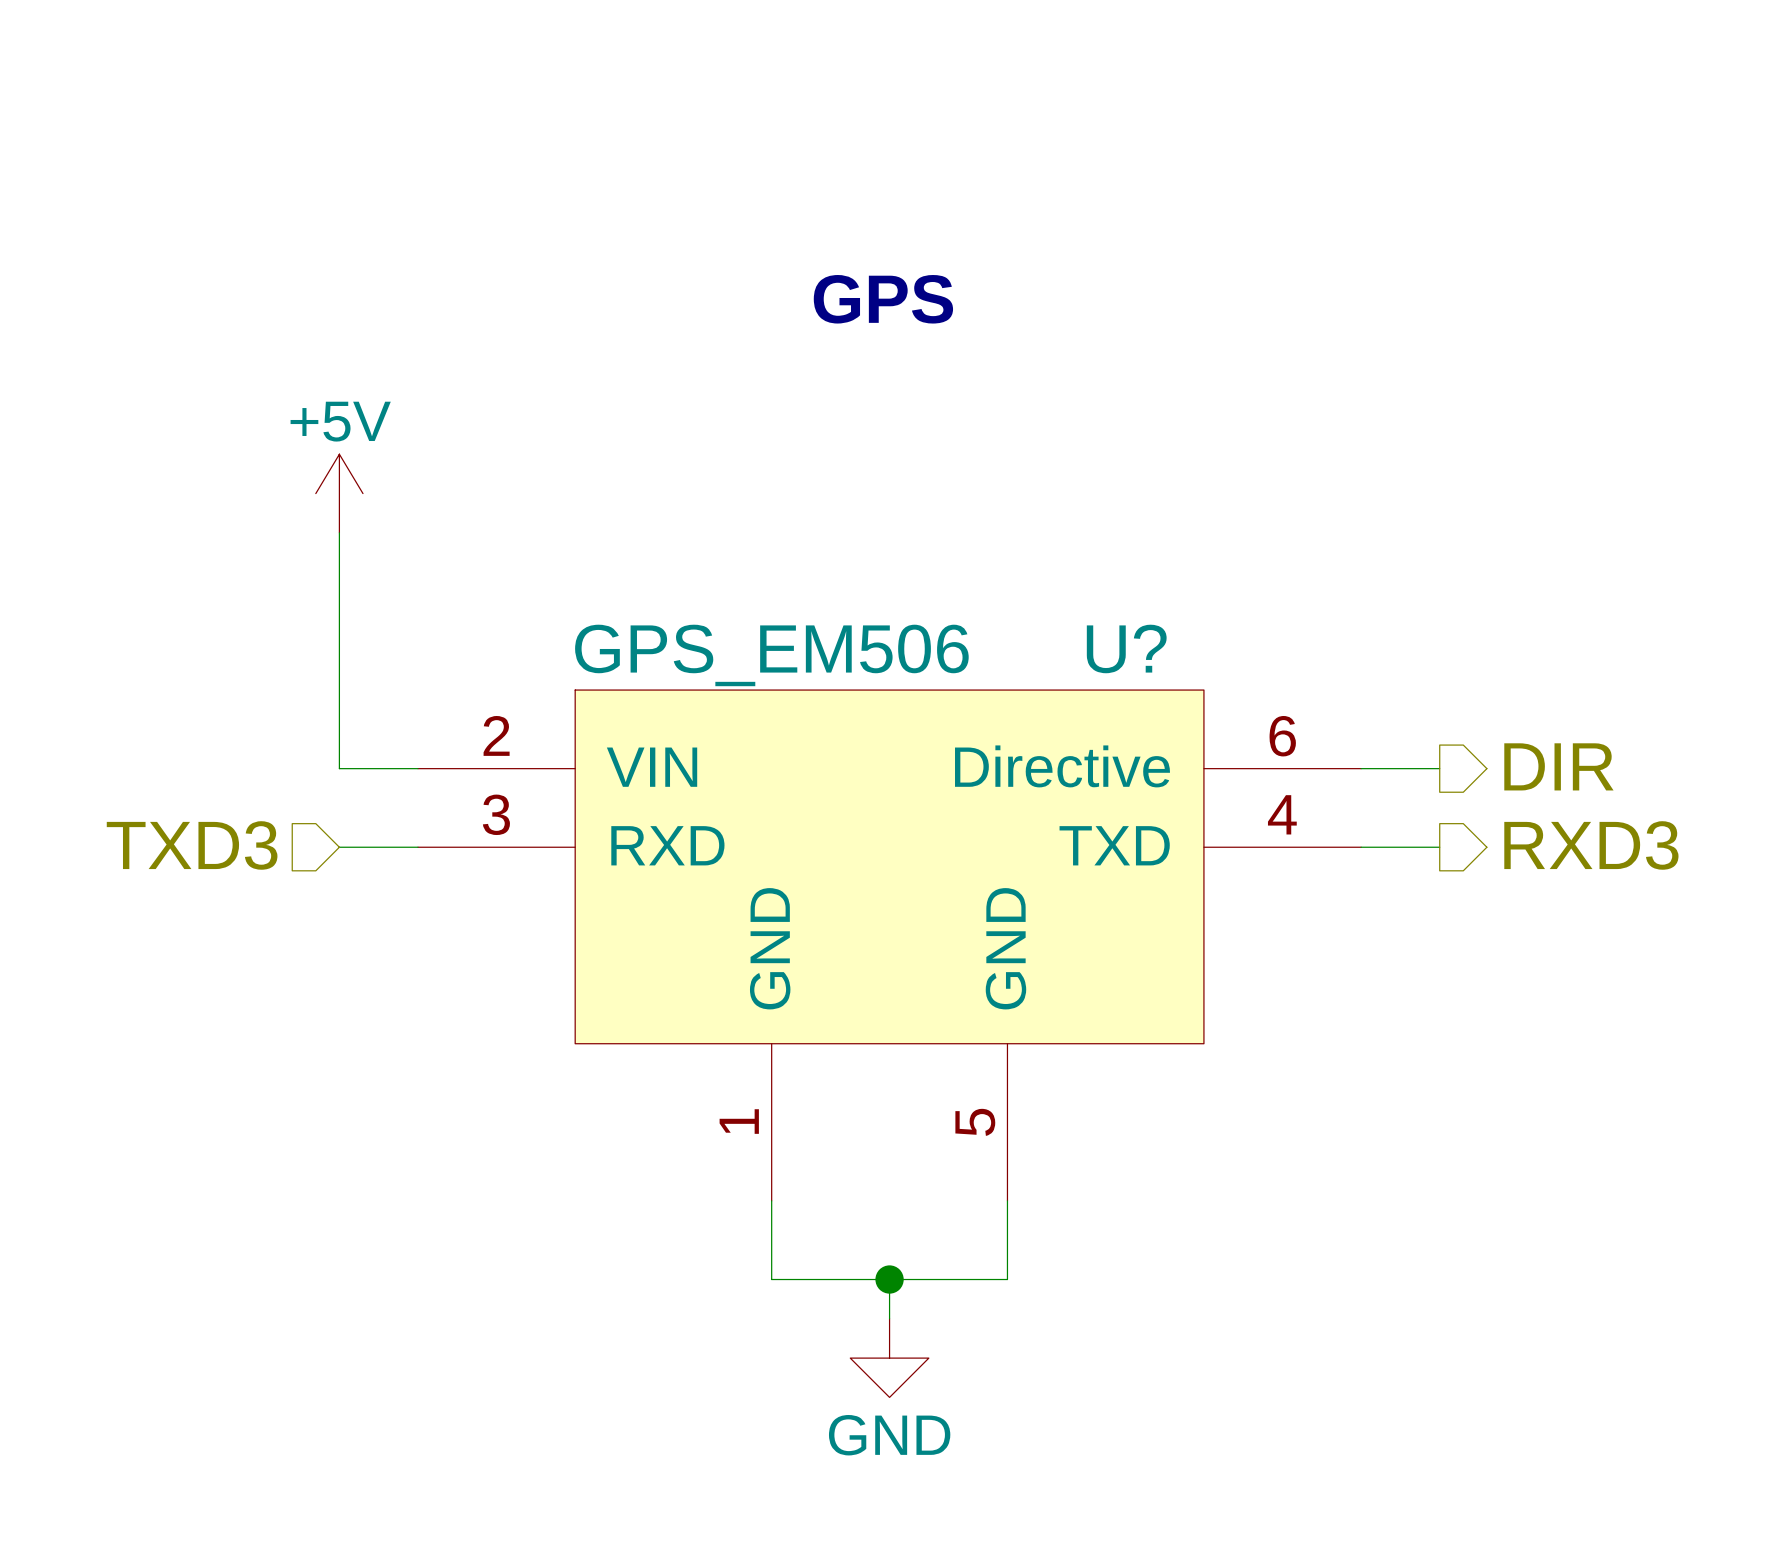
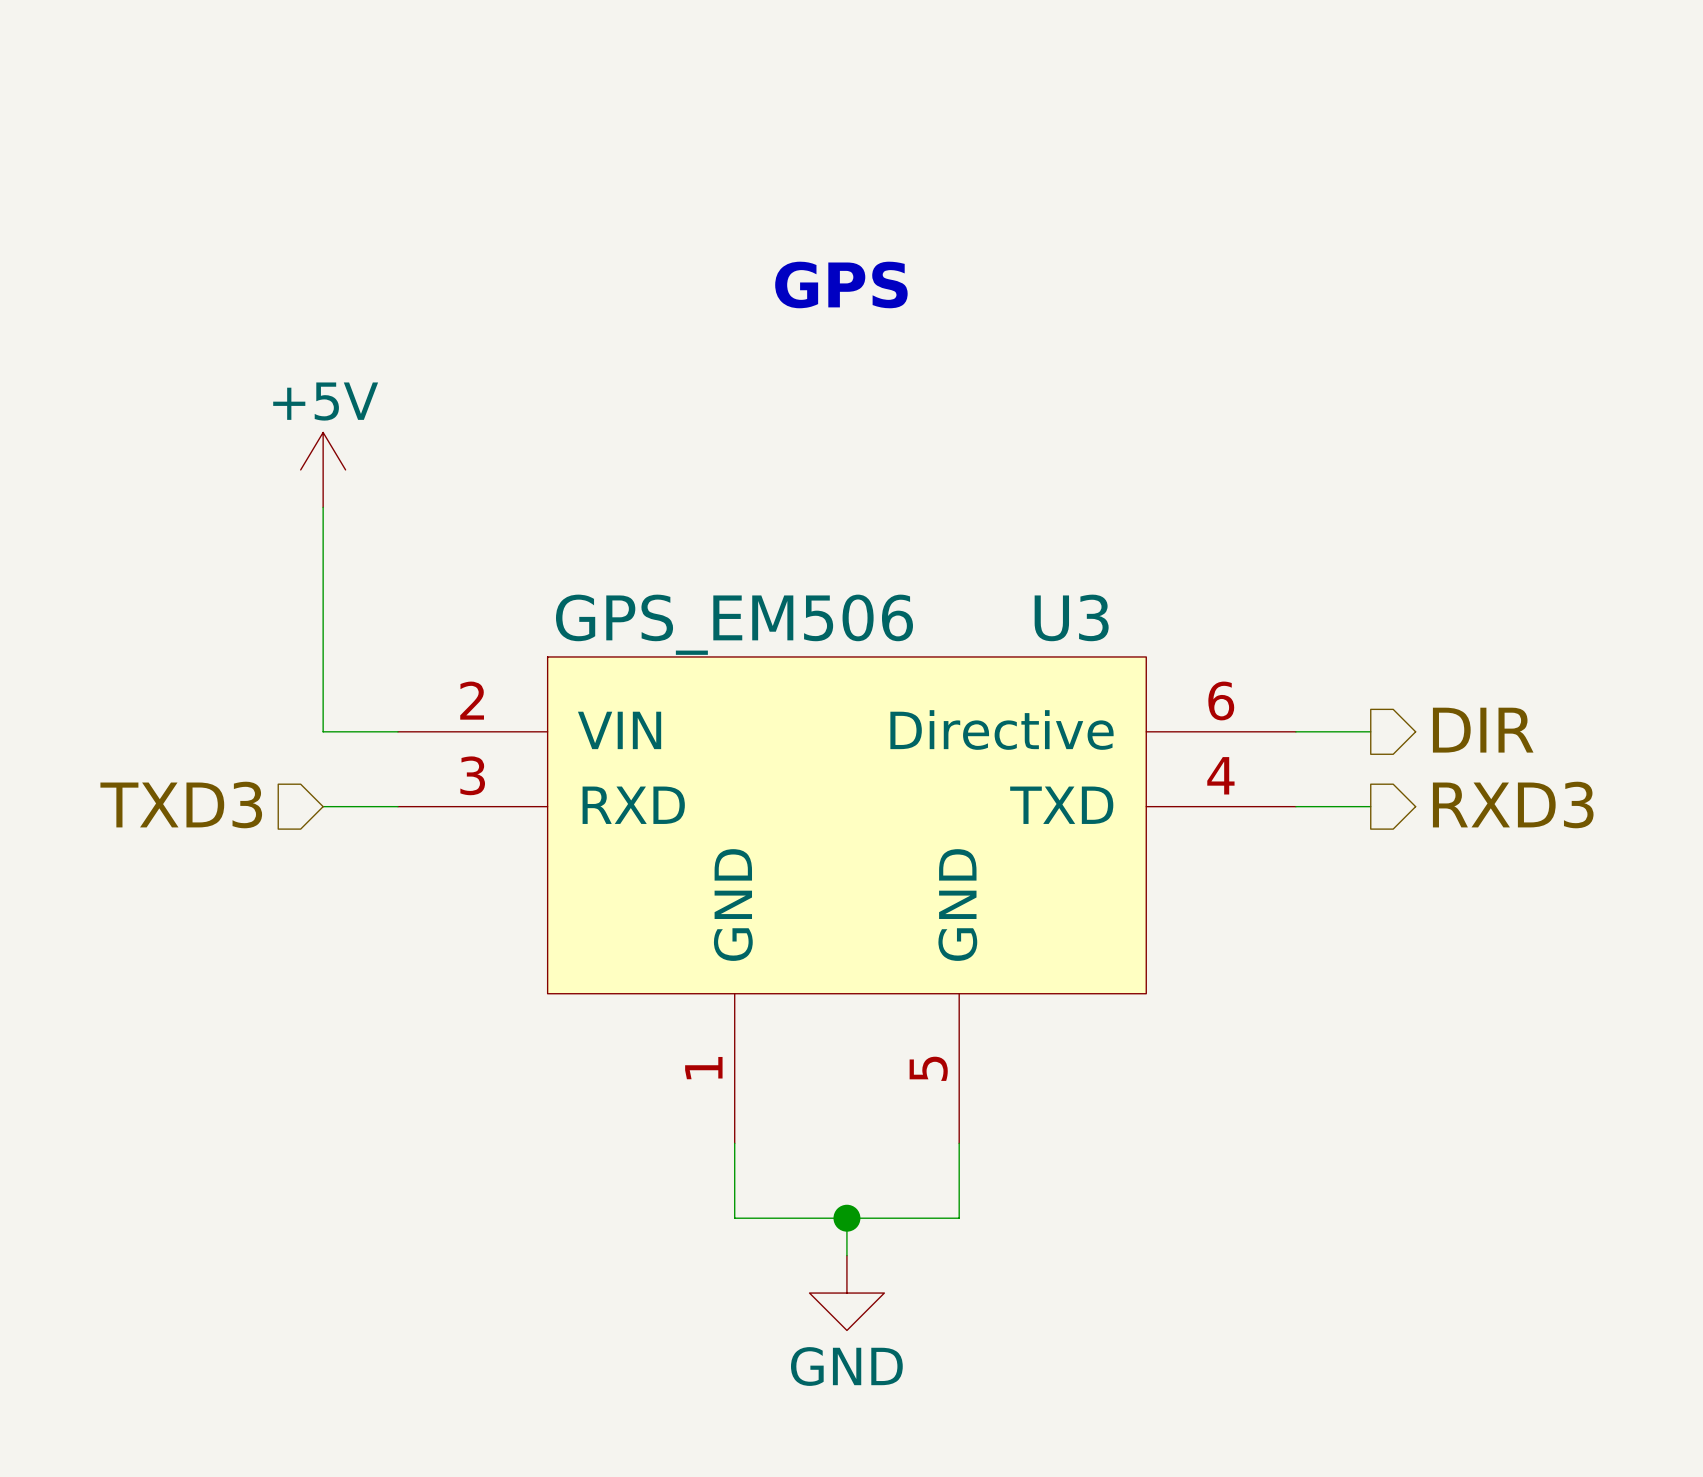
U? name: U? (1126, 648) -> U3 (1071, 617)

